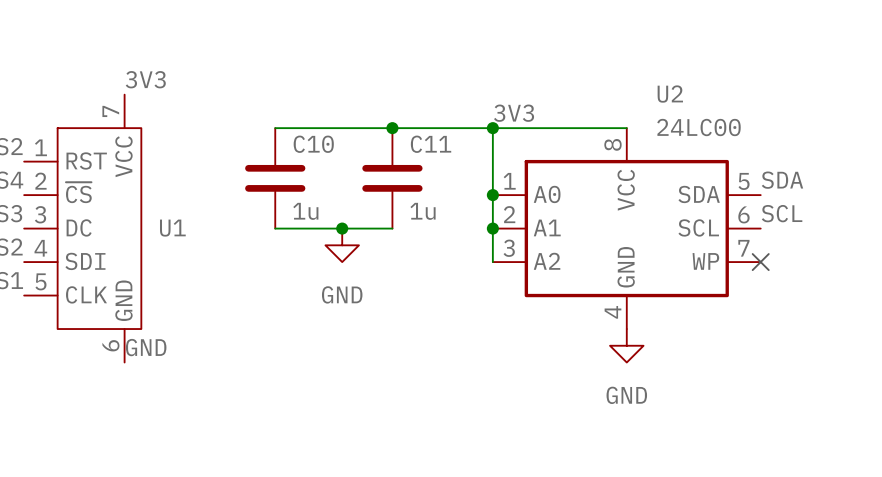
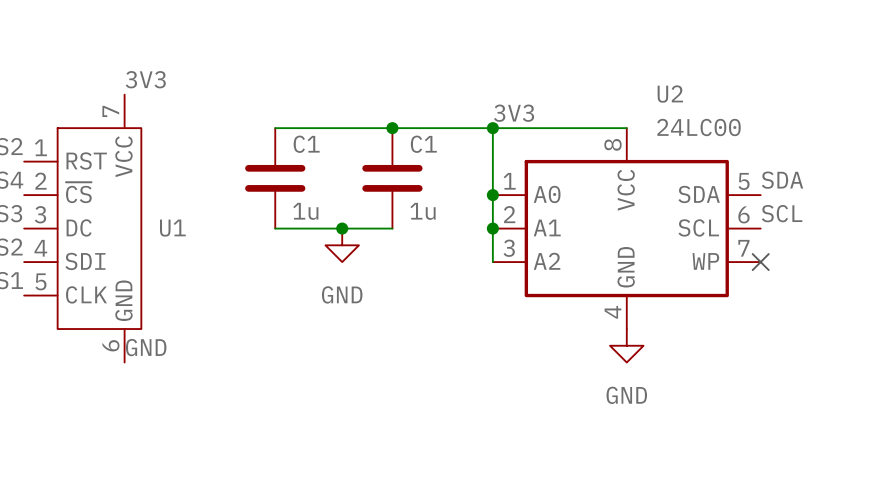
C10 name: C10 (313, 144) -> C1 (306, 144)
C11 name: C11 (431, 144) -> C1 (423, 144)

